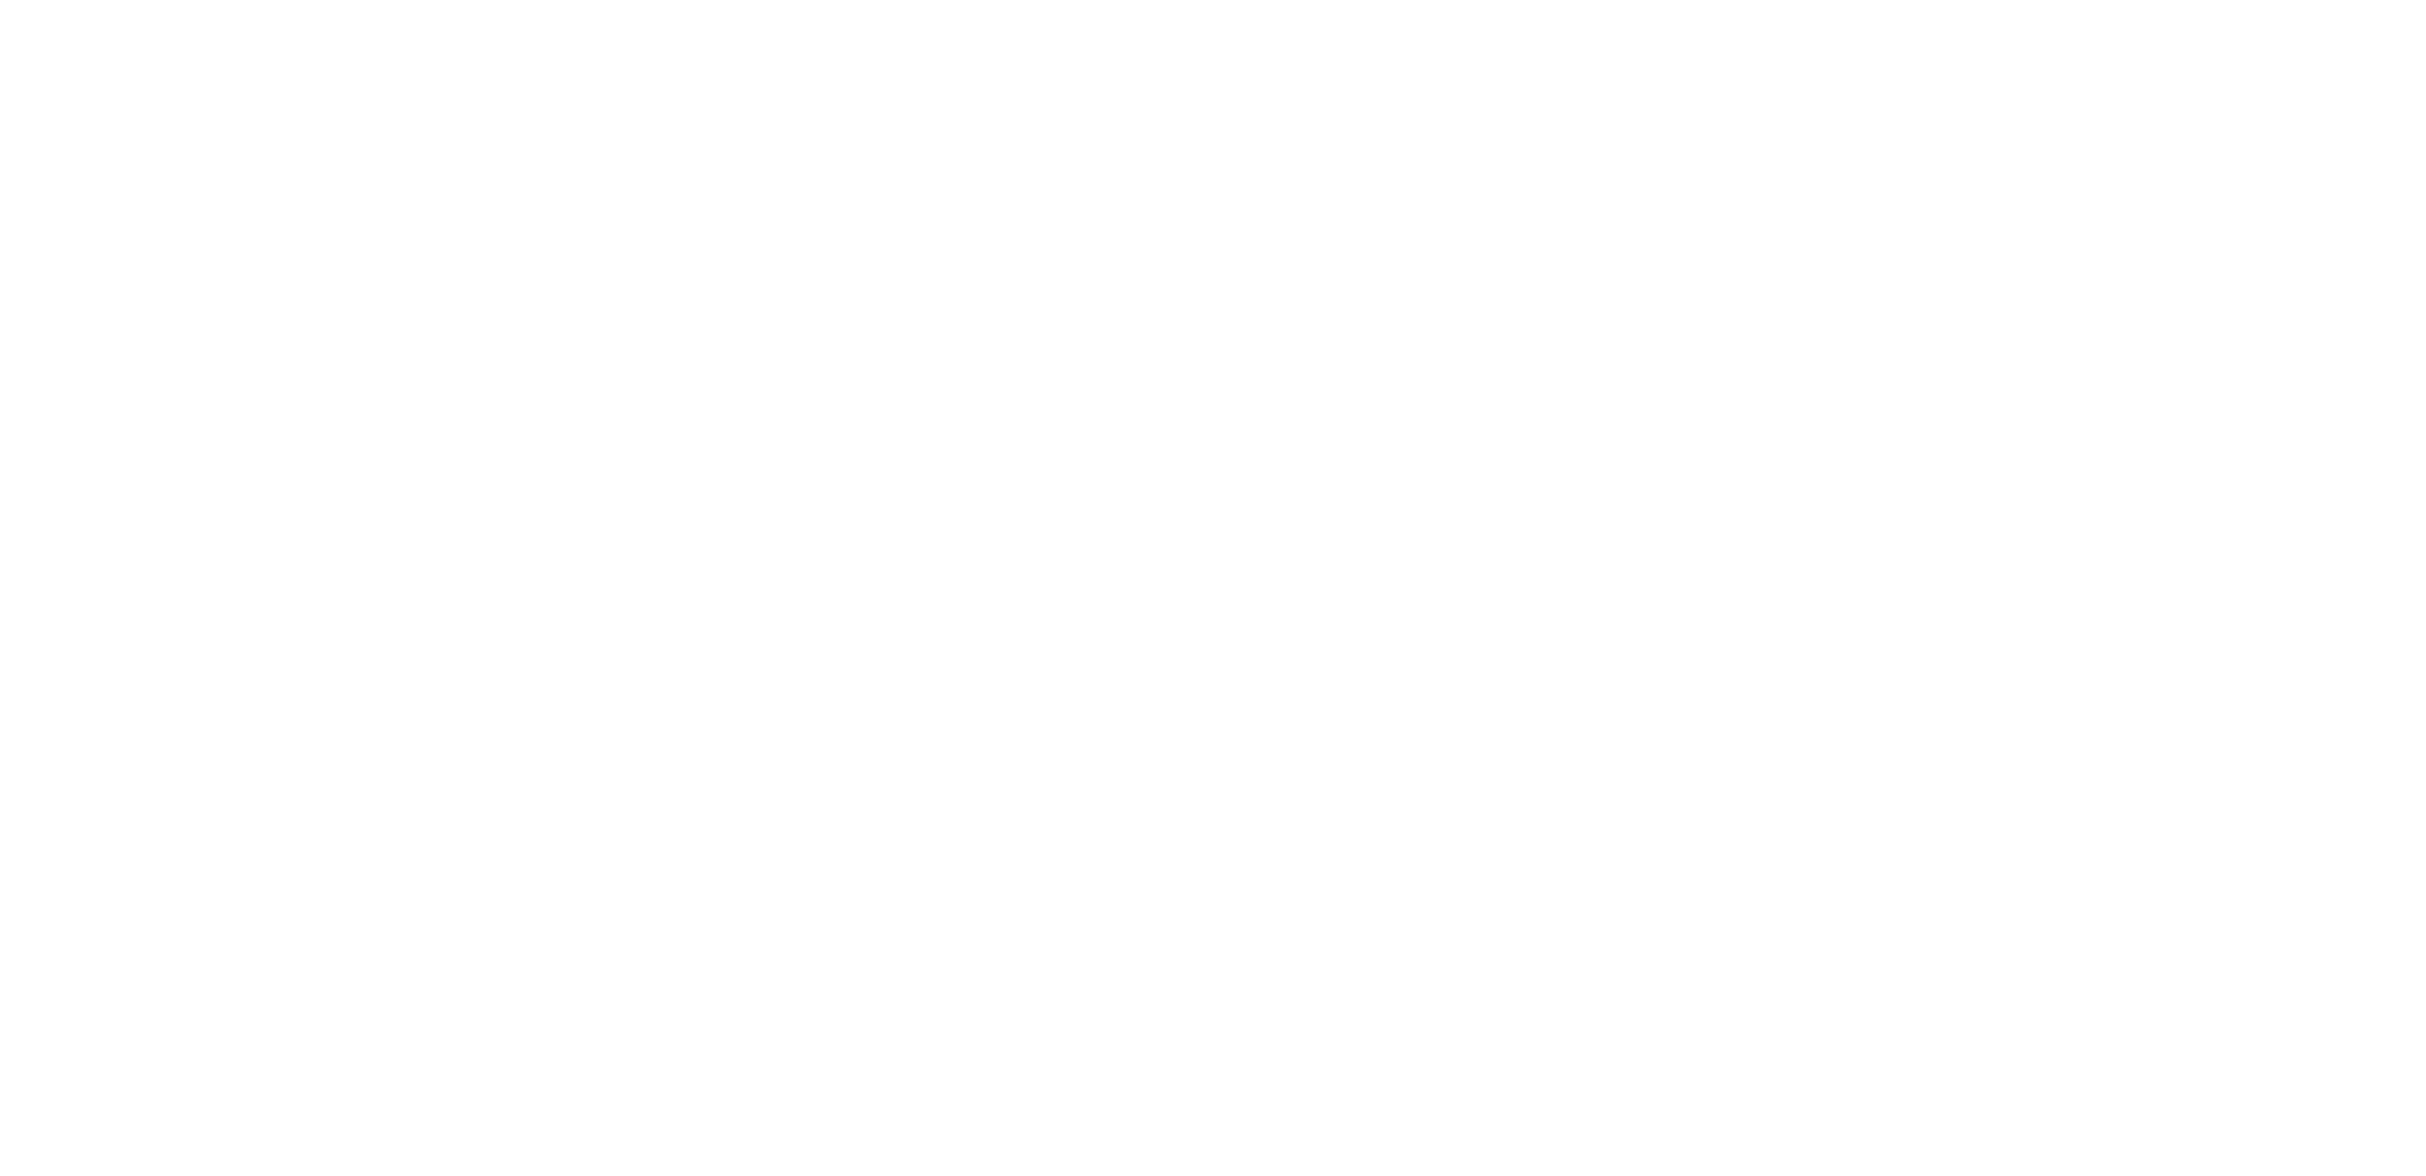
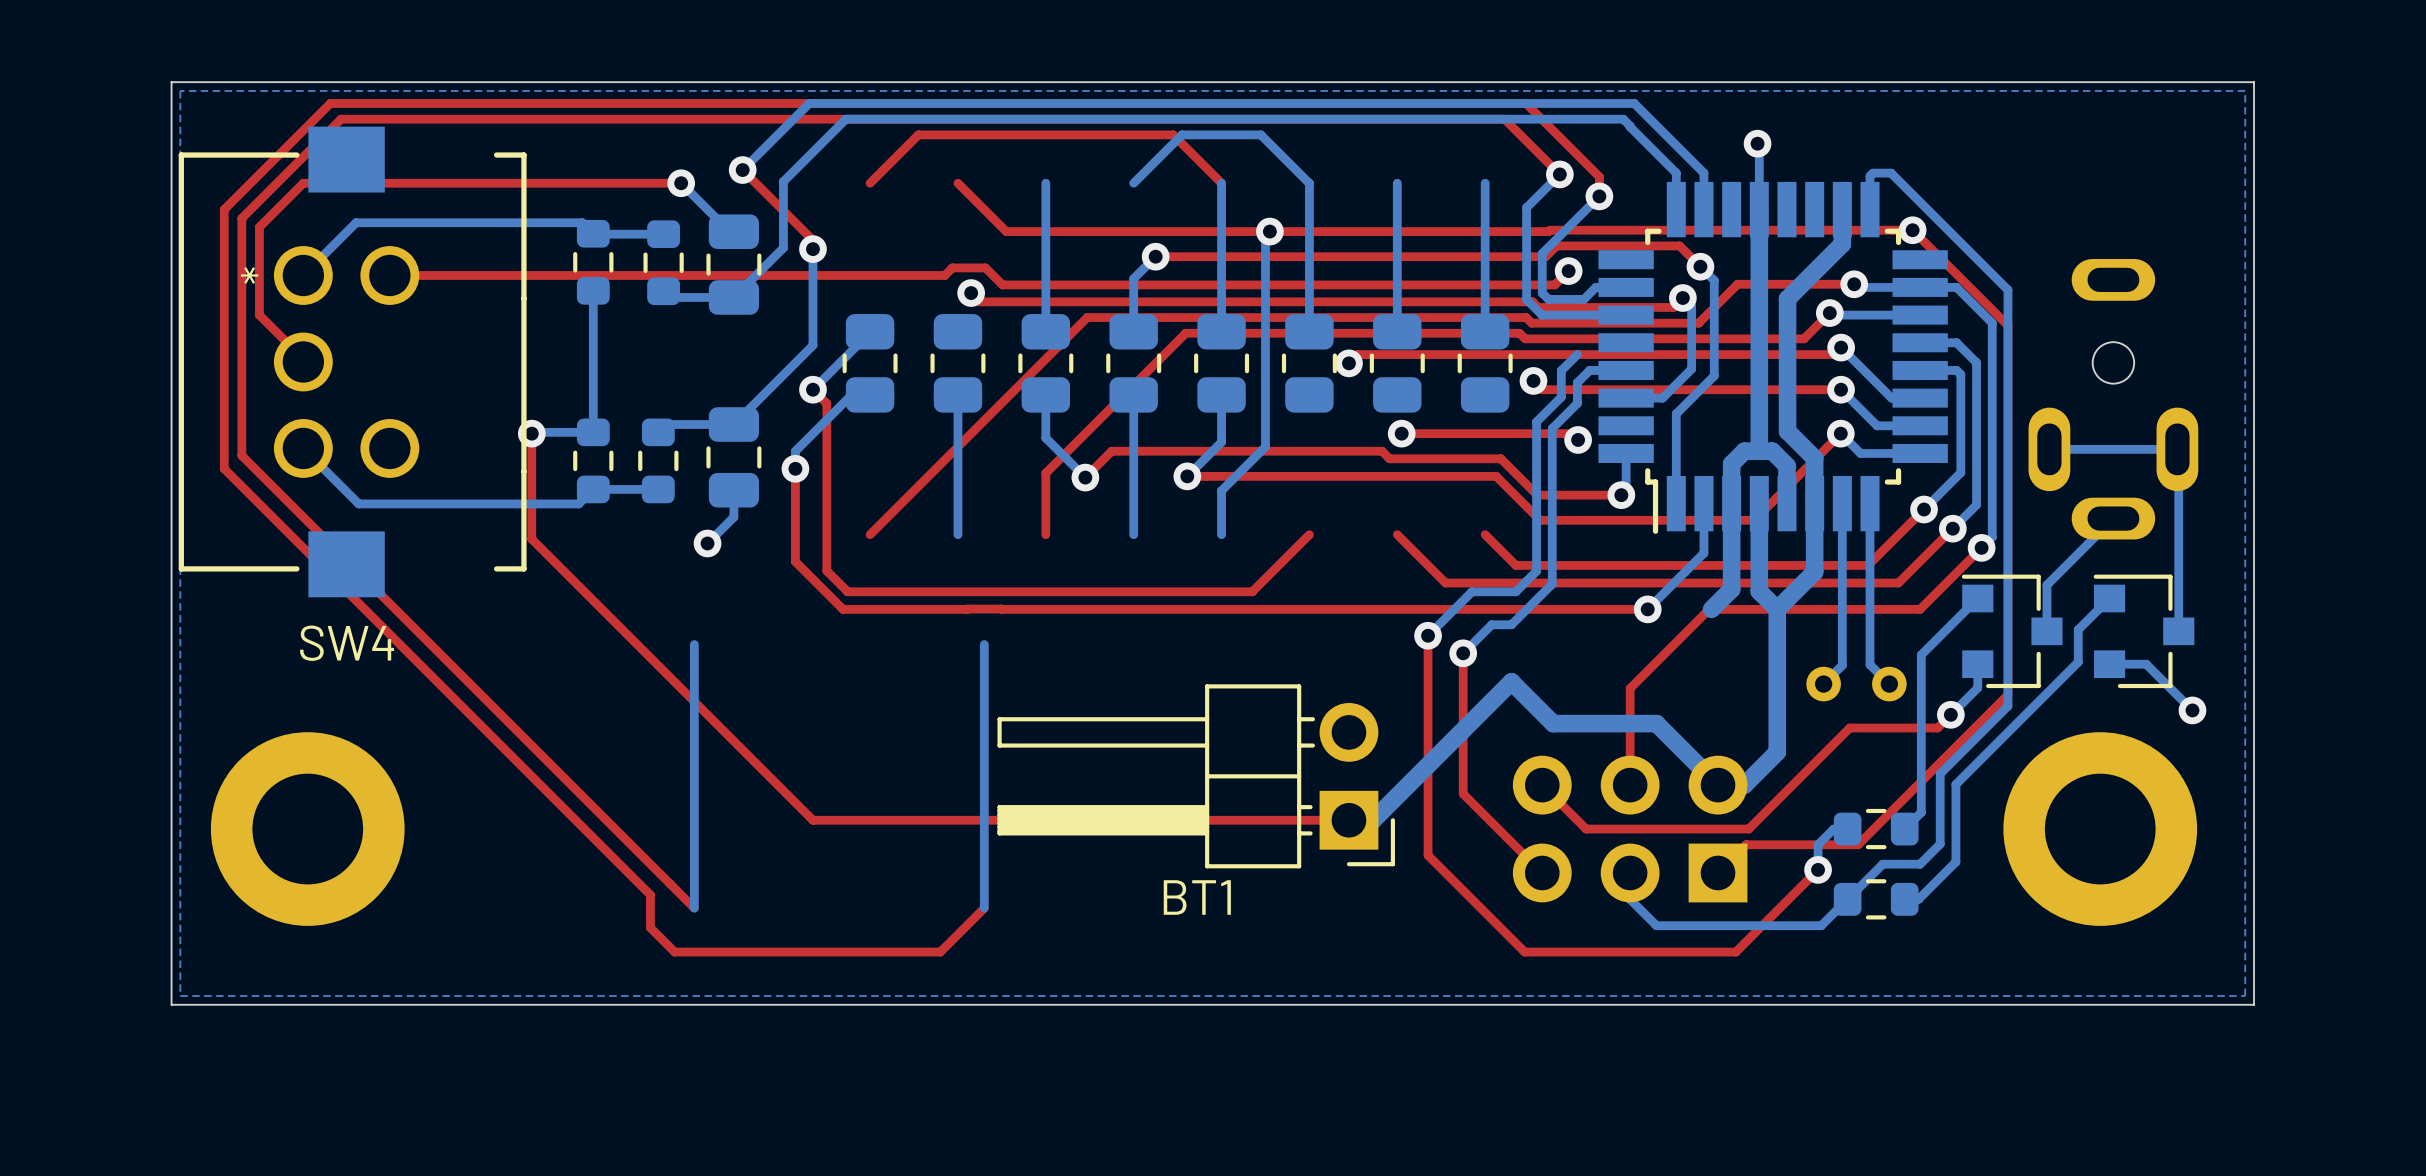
board edge: none -> (2254, 82) (171, 82) (171, 1004) (2254, 1004) (2254, 82)
bottom zone outline: none -> (2245, 90) (2245, 996) (180, 996) (180, 90) (2245, 90)
bottom track: none -> (1757, 143) (1759, 145) (1759, 448) (1761, 451)
via: none -> (1757, 143)
bottom track: none -> (742, 170) (809, 103) (1634, 103) (1703, 173) (1703, 209)
top track: none -> (742, 170) (812, 240) (812, 249)
via: none -> (742, 170)
bottom track: none -> (1559, 174) (1526, 207) (1526, 299) (1542, 315) (1626, 315)
top track: none -> (1559, 174) (1504, 119) (341, 119) (241, 218) (241, 455) (694, 908)
via: none -> (1559, 174)
bottom track: none -> (681, 183) (729, 231) (733, 231)
top track: none -> (681, 183) (303, 183) (259, 227) (259, 315) (303, 358) (303, 361)
via: none -> (681, 183)
top track: none -> (957, 183) (1006, 231) (1912, 230) (2007, 325) (2007, 694) (1858, 844) (1746, 844) (1718, 872)
bottom track: none -> (1045, 183) (1045, 331)
bottom track: none -> (1221, 183) (1221, 331)
top track: none -> (1221, 183) (1173, 134) (918, 134) (870, 183)
bottom track: none -> (1309, 183) (1309, 331)
bottom track: none -> (1309, 183) (1260, 134) (1182, 134) (1133, 183)
bottom track: none -> (1397, 183) (1397, 331)
bottom track: none -> (1485, 183) (1485, 331)
bottom track: none -> (1599, 196) (1542, 253) (1542, 293) (1548, 299) (1583, 299) (1595, 287) (1626, 287)
top track: none -> (1599, 196) (1599, 176) (1526, 103) (330, 103) (224, 209) (224, 468) (650, 894) (650, 927) (674, 952) (940, 952) (984, 908)
via: none -> (1599, 196)
bottom track: none -> (1676, 209) (1676, 173) (1623, 119) (845, 119) (783, 181) (783, 247) (733, 297) (669, 297) (663, 291)
bottom track: none -> (1842, 209) (1842, 244) (1787, 298) (1787, 431) (1814, 458) (1814, 571) (1777, 609)
bottom track: none -> (1870, 209) (1870, 176) (1873, 173) (1891, 173) (2007, 290) (2007, 706) (1940, 773) (1940, 844) (1920, 864) (1882, 864) (1821, 925) (1656, 925) (1630, 899) (1630, 872)
via: none -> (1912, 230)
bottom track: none -> (1269, 231) (1265, 235) (1265, 446) (1221, 490) (1221, 534)
via: none -> (1269, 231)
bottom track: none -> (663, 234) (593, 234) (582, 222) (356, 222) (303, 275)
bottom track: none -> (812, 249) (812, 345) (733, 424) (666, 424) (658, 432)
via: none -> (812, 249)
bottom track: none -> (1155, 256) (1133, 278) (1133, 331)
top track: none -> (1155, 256) (1545, 256) (1556, 245) (1679, 245) (1700, 266)
via: none -> (1155, 256)
part: none -> (593, 262)
part: none -> (663, 262)
part: none -> (733, 264)
bottom track: none -> (1699, 265) (1714, 280) (1714, 375) (1676, 413) (1676, 503)
via: none -> (1700, 266)
top track: none -> (1568, 271) (1554, 284) (1002, 284) (985, 267) (952, 267) (944, 275) (389, 275)
via: none -> (1568, 271)
bottom track: none -> (1854, 284) (1857, 287) (1956, 287) (1992, 323) (1992, 537) (1981, 547)
top track: none -> (1854, 284) (1737, 284) (1698, 323) (1531, 323) (1526, 317) (1087, 317) (870, 534)
via: none -> (1854, 284)
bottom track: none -> (593, 290) (593, 432) (531, 433)
top track: none -> (971, 293) (979, 301) (1532, 301) (1538, 307) (1673, 307) (1682, 298)
via: none -> (971, 293)
bottom track: none -> (1682, 298) (1691, 306) (1691, 369) (1662, 398) (1626, 398)
via: none -> (1682, 298)
bottom track: none -> (1829, 313) (1831, 315) (1920, 315)
top track: none -> (1829, 313) (1804, 338) (1525, 338) (1519, 333) (1185, 333) (1045, 473) (1045, 534)
via: none -> (1829, 313)
bottom track: none -> (870, 331) (812, 389)
bottom track: none -> (1920, 342) (1956, 342) (1976, 362) (1976, 504) (1952, 528)
bottom track: none -> (1841, 347) (1891, 398) (1920, 398)
top track: none -> (1841, 347) (1834, 354) (1357, 354) (1348, 363)
via: none -> (1841, 347)
bottom track: none -> (1577, 354) (1561, 370) (1561, 397) (1536, 421) (1536, 571) (1515, 591) (1471, 591) (1428, 635)
part: none -> (1773, 357)
SW4: none -> (352, 361)
part: none -> (870, 363)
part: none -> (957, 363)
part: none -> (1045, 363)
part: none -> (1133, 363)
part: none -> (1221, 363)
part: none -> (1309, 363)
via: none -> (1348, 363)
part: none -> (1397, 363)
part: none -> (1485, 363)
bottom track: none -> (1626, 370) (1589, 370) (1577, 382) (1577, 403) (1552, 428) (1552, 584) (1511, 624) (1491, 624) (1463, 653)
bottom track: none -> (1920, 370) (1956, 370) (1960, 374) (1960, 472) (1924, 509)
top track: none -> (1533, 380) (1542, 389) (1841, 389)
via: none -> (1533, 380)
top track: none -> (812, 389) (826, 403) (826, 570) (847, 591) (1252, 591) (1309, 534)
via: none -> (812, 389)
bottom track: none -> (1841, 389) (1877, 425) (1920, 425)
via: none -> (1841, 389)
bottom track: none -> (870, 394) (851, 394) (795, 451) (795, 468)
bottom track: none -> (957, 394) (957, 534)
bottom track: none -> (1045, 394) (1045, 438) (1085, 477)
bottom track: none -> (1133, 394) (1133, 534)
bottom track: none -> (1221, 394) (1221, 442) (1187, 476)
part: none -> (2113, 399)
top track: none -> (531, 433) (531, 539) (812, 820) (1348, 820)
via: none -> (531, 433)
top track: none -> (1401, 433) (1571, 433) (1578, 439)
via: none -> (1401, 433)
bottom track: none -> (1840, 433) (1860, 453) (1920, 453)
top track: none -> (1840, 433) (1754, 520) (1540, 520) (1496, 476) (1187, 476)
via: none -> (1840, 433)
via: none -> (1578, 439)
bottom track: none -> (303, 448) (358, 503) (578, 503) (593, 489) (658, 489)
bottom track: none -> (2049, 449) (2178, 450) (2178, 631) (2174, 627)
bottom track: none -> (1626, 453) (1626, 490) (1621, 495)
part: none -> (733, 457)
part: none -> (593, 460)
part: none -> (658, 460)
top track: none -> (795, 468) (795, 561) (843, 609) (966, 609)
via: none -> (795, 468)
via: none -> (1187, 476)
top track: none -> (1085, 477) (1111, 451) (1382, 451) (1389, 458) (1500, 458) (1537, 495) (1621, 495)
via: none -> (1085, 477)
bottom track: none -> (733, 490) (733, 517) (707, 543)
via: none -> (1621, 495)
bottom track: none -> (1703, 503) (1703, 553) (1647, 609)
bottom track: none -> (1759, 503) (1759, 591) (1777, 609)
bottom track: none -> (1786, 503) (1786, 465) (1772, 451) (1744, 451) (1731, 463) (1731, 589) (1711, 609)
bottom track: none -> (1842, 503) (1842, 665) (1823, 684)
bottom track: none -> (1870, 503) (1870, 664) (1889, 684)
top track: none -> (1924, 509) (1868, 565) (1515, 565) (1485, 534)
via: none -> (1924, 509)
bottom track: none -> (2113, 518) (2046, 585) (2046, 631)
top track: none -> (1952, 528) (1898, 583) (1445, 583) (1397, 534)
via: none -> (1952, 528)
via: none -> (707, 543)
top track: none -> (1981, 547) (1920, 609) (1709, 609) (1630, 688) (1630, 785)
via: none -> (1981, 547)
bottom track: none -> (1977, 598) (1921, 654) (1921, 812) (1904, 829)
bottom track: none -> (2109, 598) (2078, 629) (2078, 662) (1955, 784) (1955, 861) (1918, 899) (1904, 899)
top track: none -> (1001, 609) (967, 609)
top track: none -> (1647, 609) (1001, 609)
via: none -> (1647, 609)
bottom track: none -> (1777, 609) (1777, 752) (1744, 785) (1718, 785) (1656, 723) (1553, 723) (1511, 681) (1373, 820) (1348, 820)
part: none -> (2012, 631)
part: none -> (2144, 631)
top track: none -> (1428, 635) (1428, 855) (1524, 952) (1735, 952) (1818, 869)
via: none -> (1428, 635)
bottom track: none -> (694, 644) (694, 908)
bottom track: none -> (984, 644) (984, 908)
top track: none -> (1463, 653) (1463, 793) (1542, 872)
via: none -> (1463, 653)
bottom track: none -> (1977, 664) (1977, 687) (1950, 714)
bottom track: none -> (2109, 664) (2146, 664) (2192, 710)
part: none -> (1856, 684)
via: none -> (2192, 710)
top track: none -> (1950, 714) (1937, 728) (1849, 728) (1748, 829) (1586, 829) (1542, 785)
via: none -> (1950, 714)
BT1: none -> (1196, 776)
part: none -> (307, 829)
part: none -> (1630, 829)
bottom track: none -> (1847, 829) (1833, 829) (1818, 844) (1818, 869)
part: none -> (1876, 829)
part: none -> (2100, 829)
via: none -> (1818, 869)
part: none -> (1876, 899)

